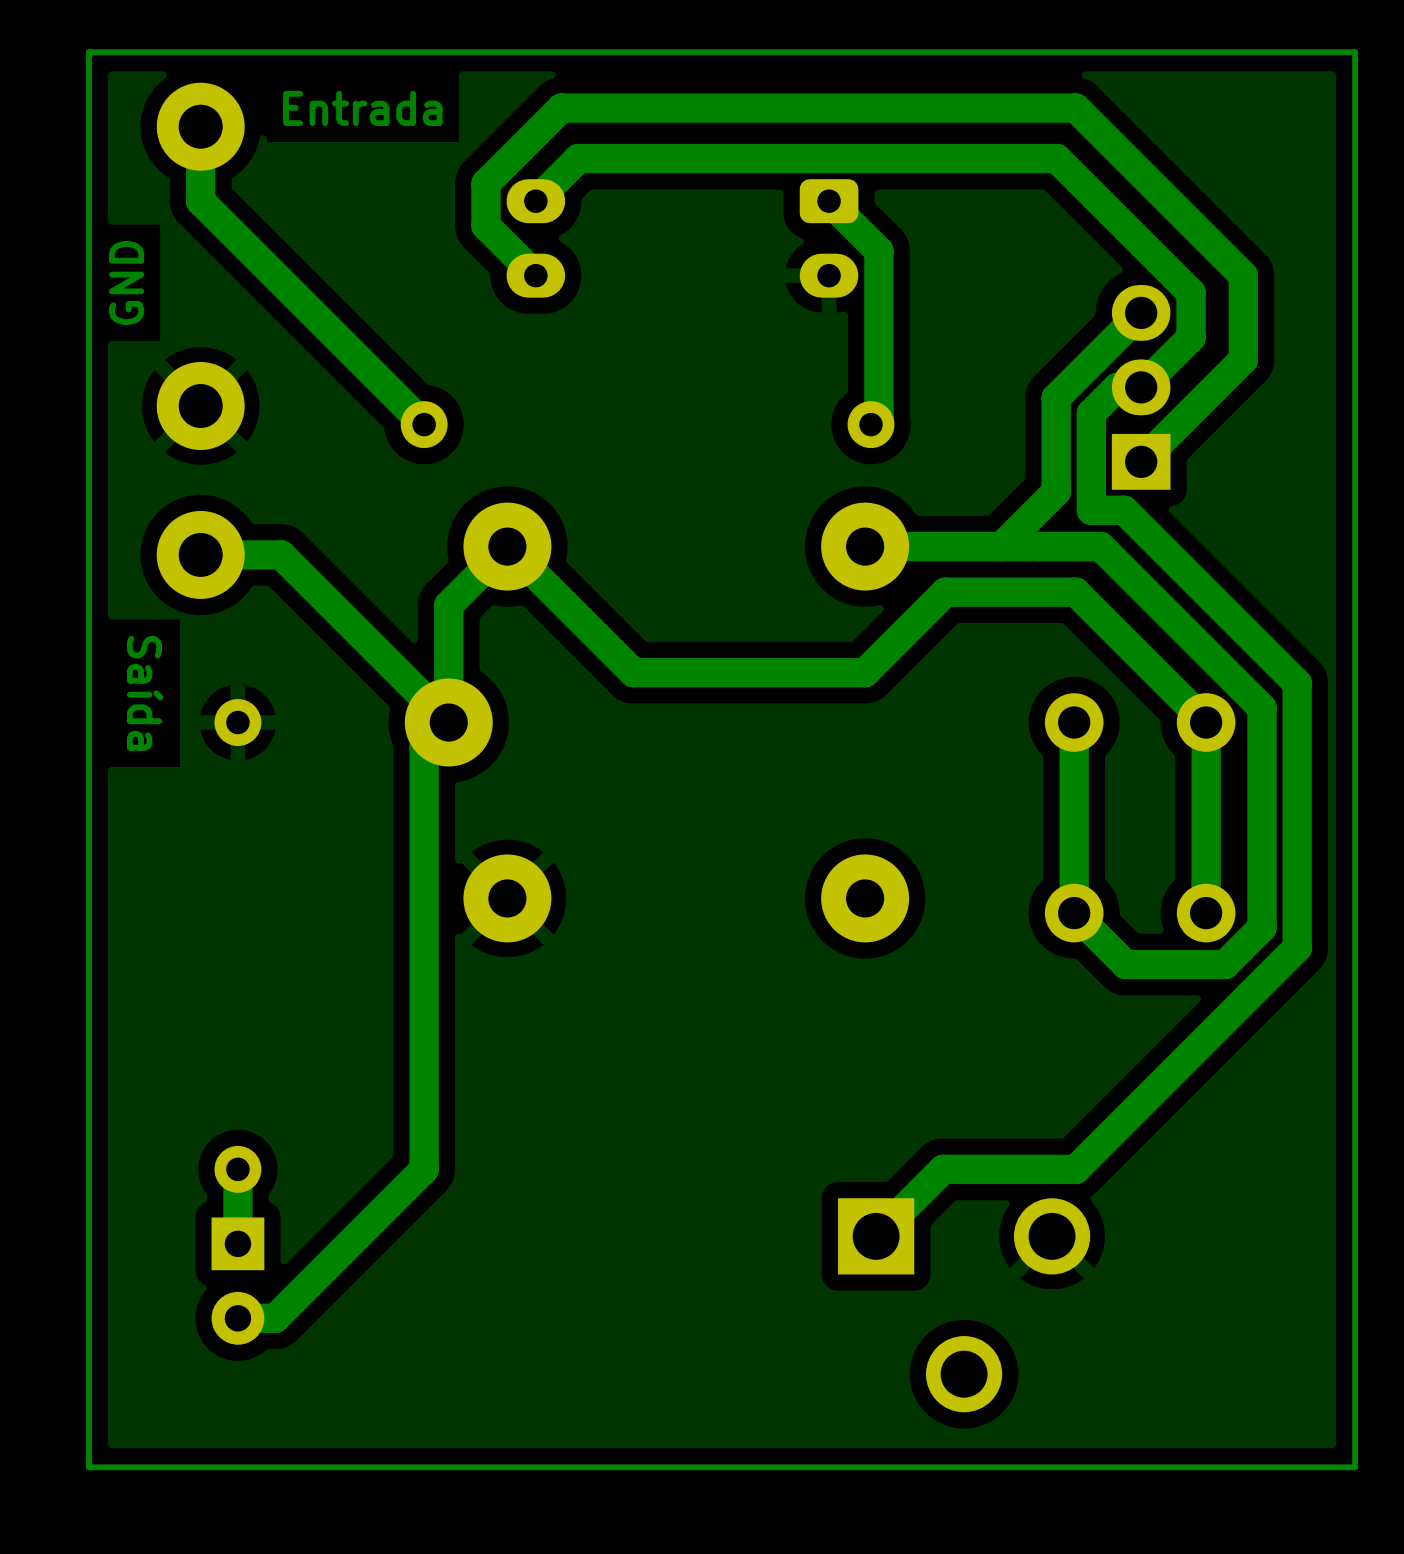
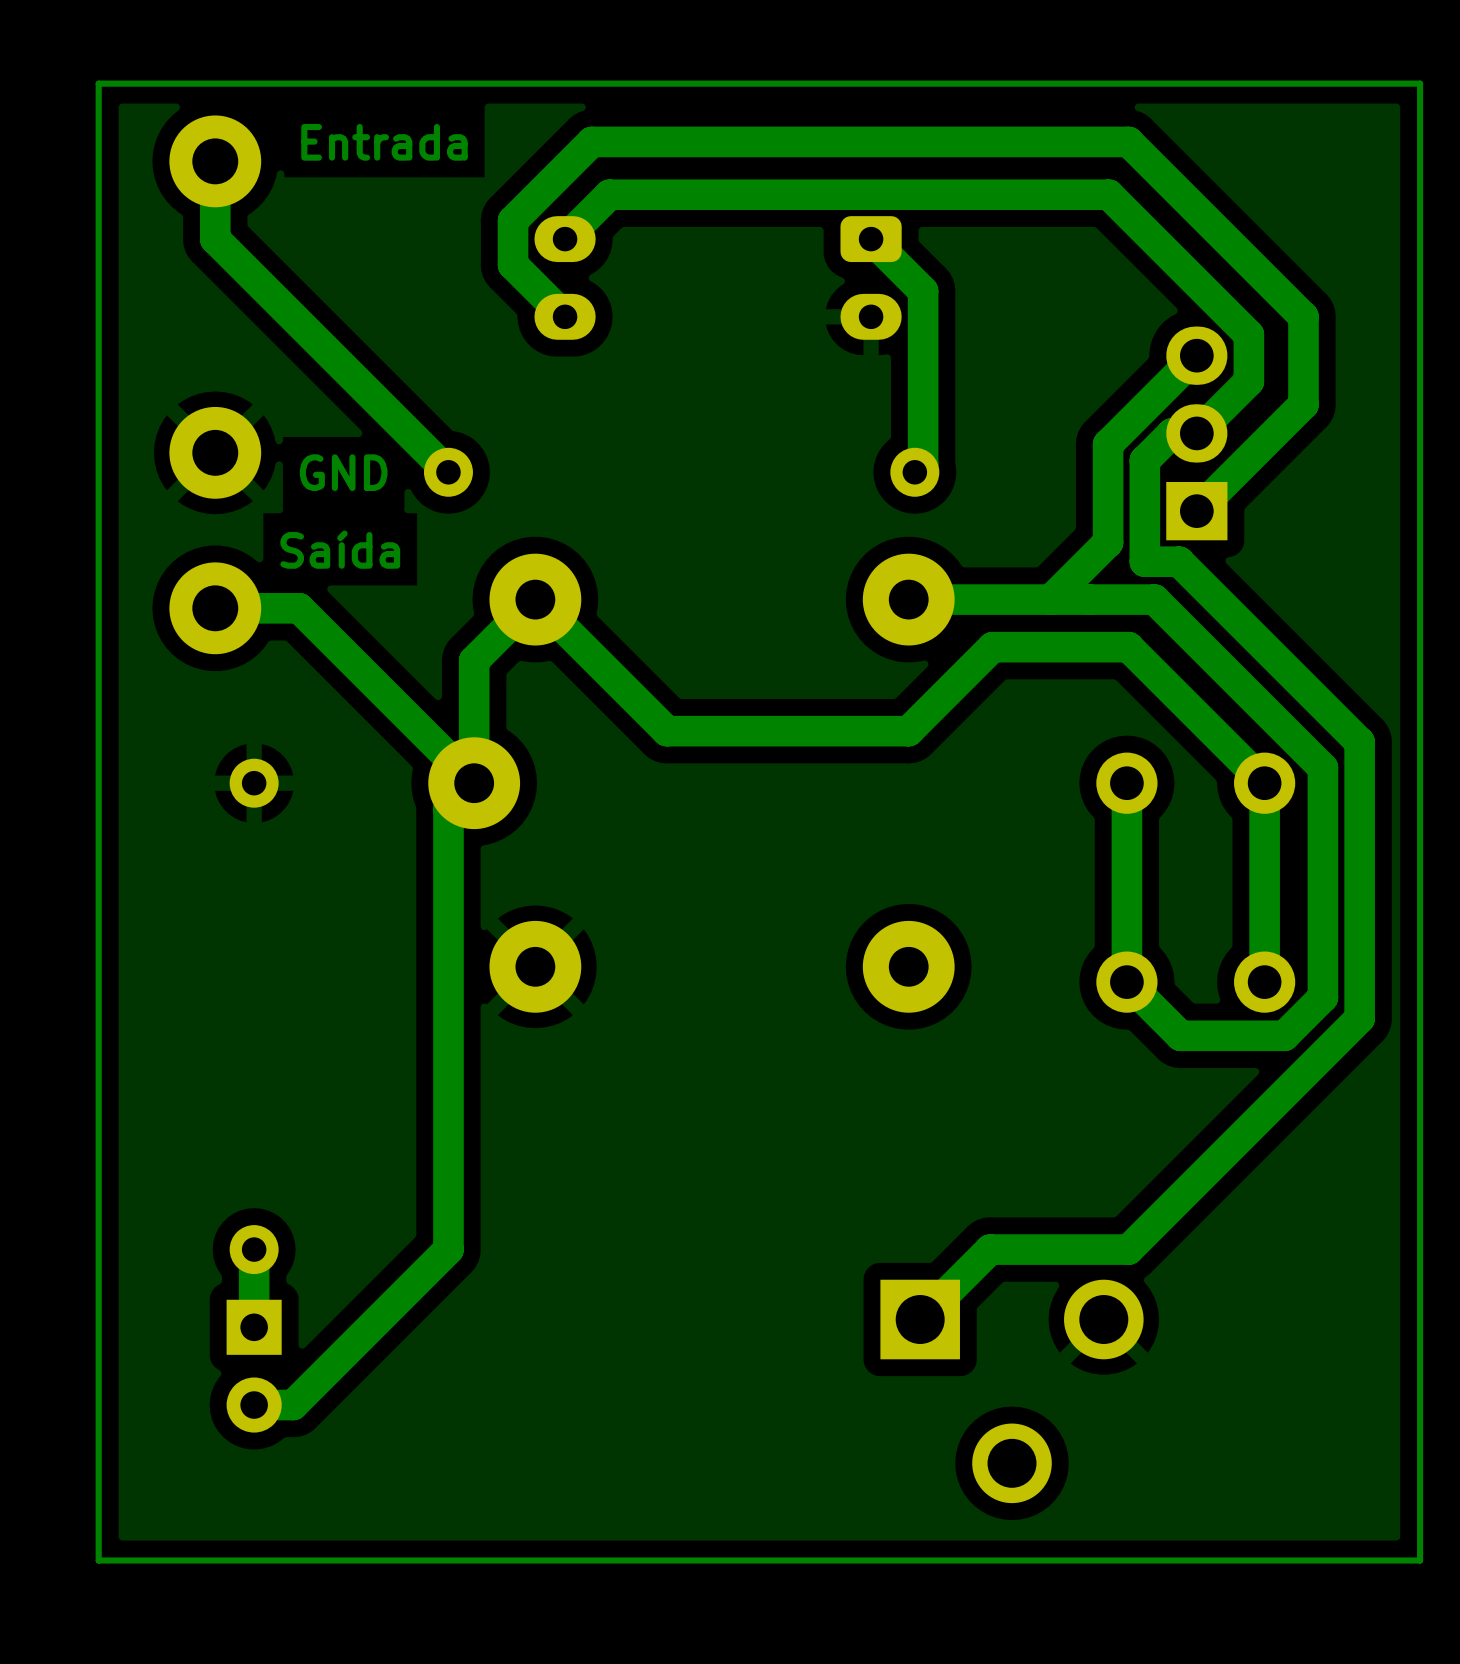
text rotation: 0° (126, 282) -> 90° clockwise (343, 472)
text position: GND (126, 282) -> GND (343, 472)
text rotation: 0° (145, 693) -> 90° counterclockwise (340, 549)
text position: Saída (145, 693) -> Saída (340, 549)

